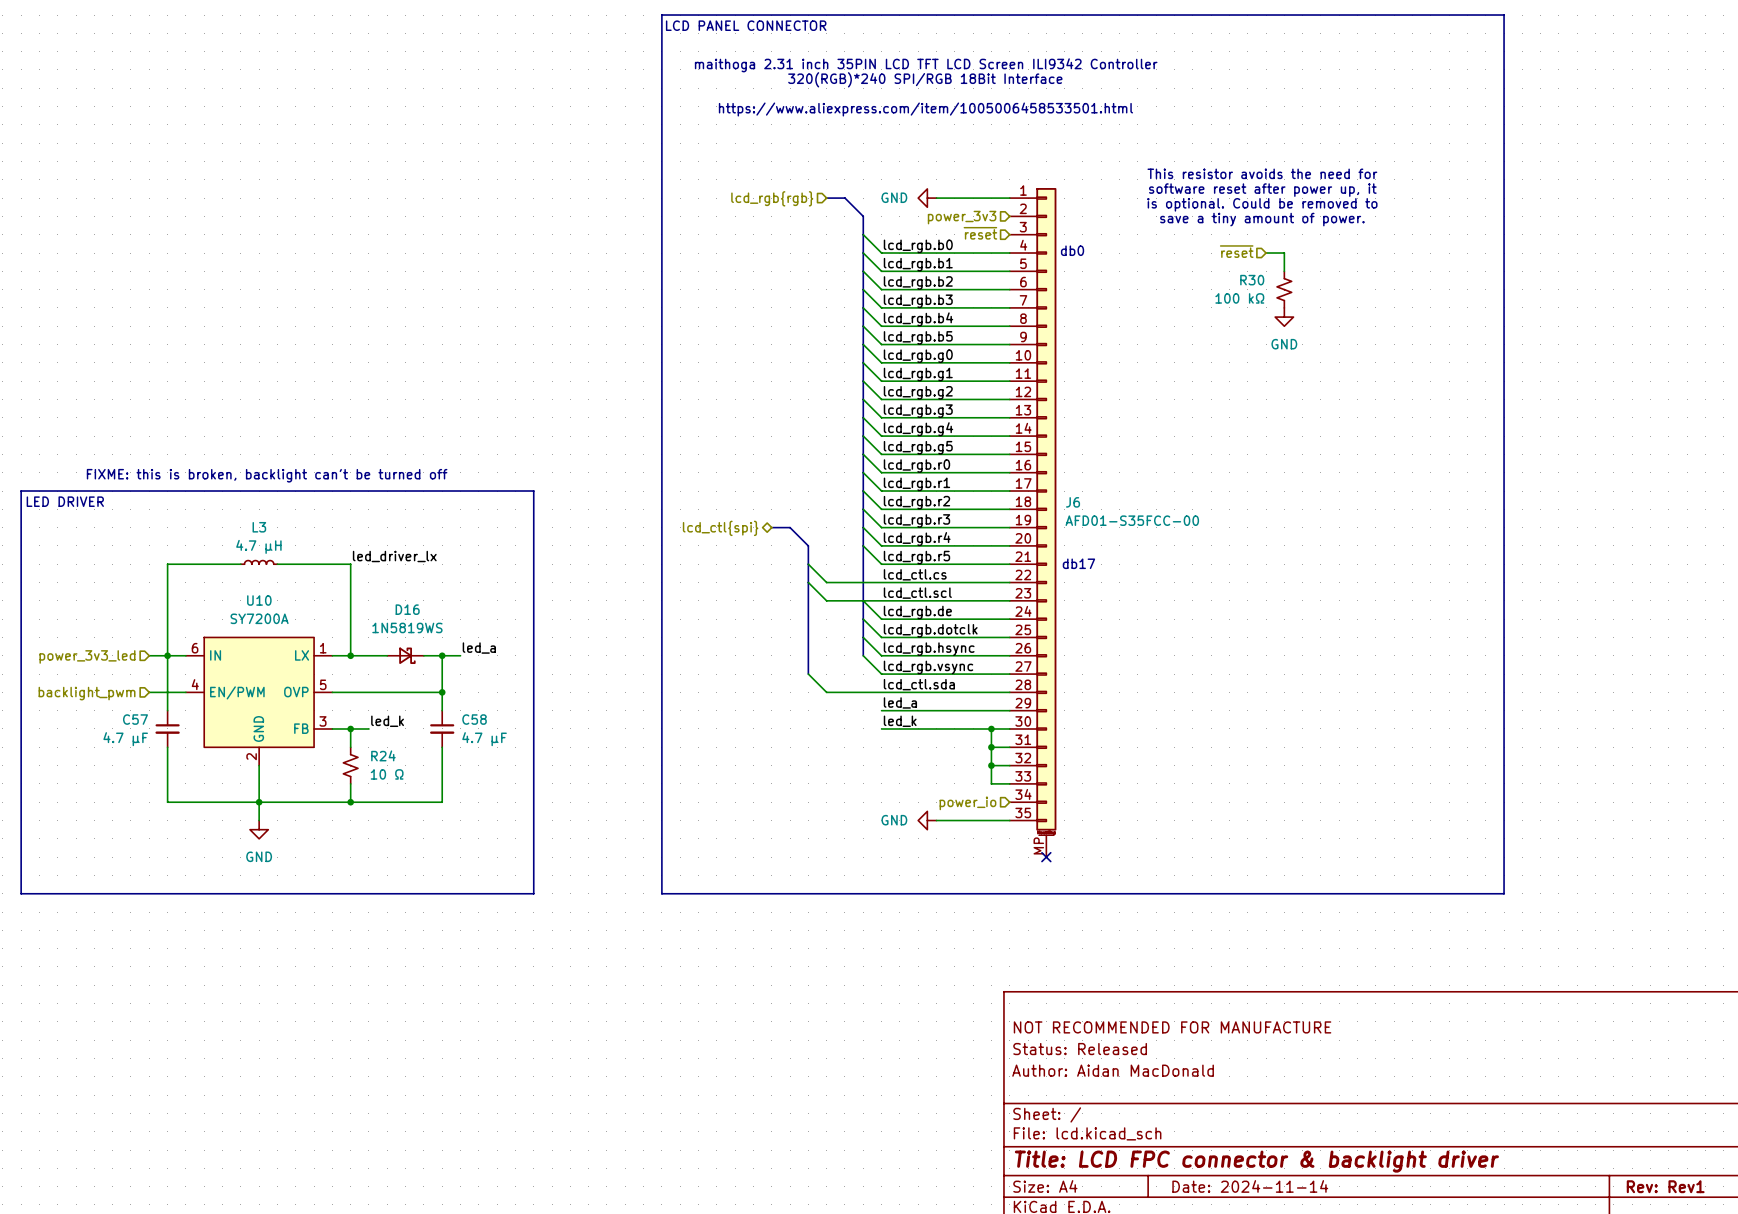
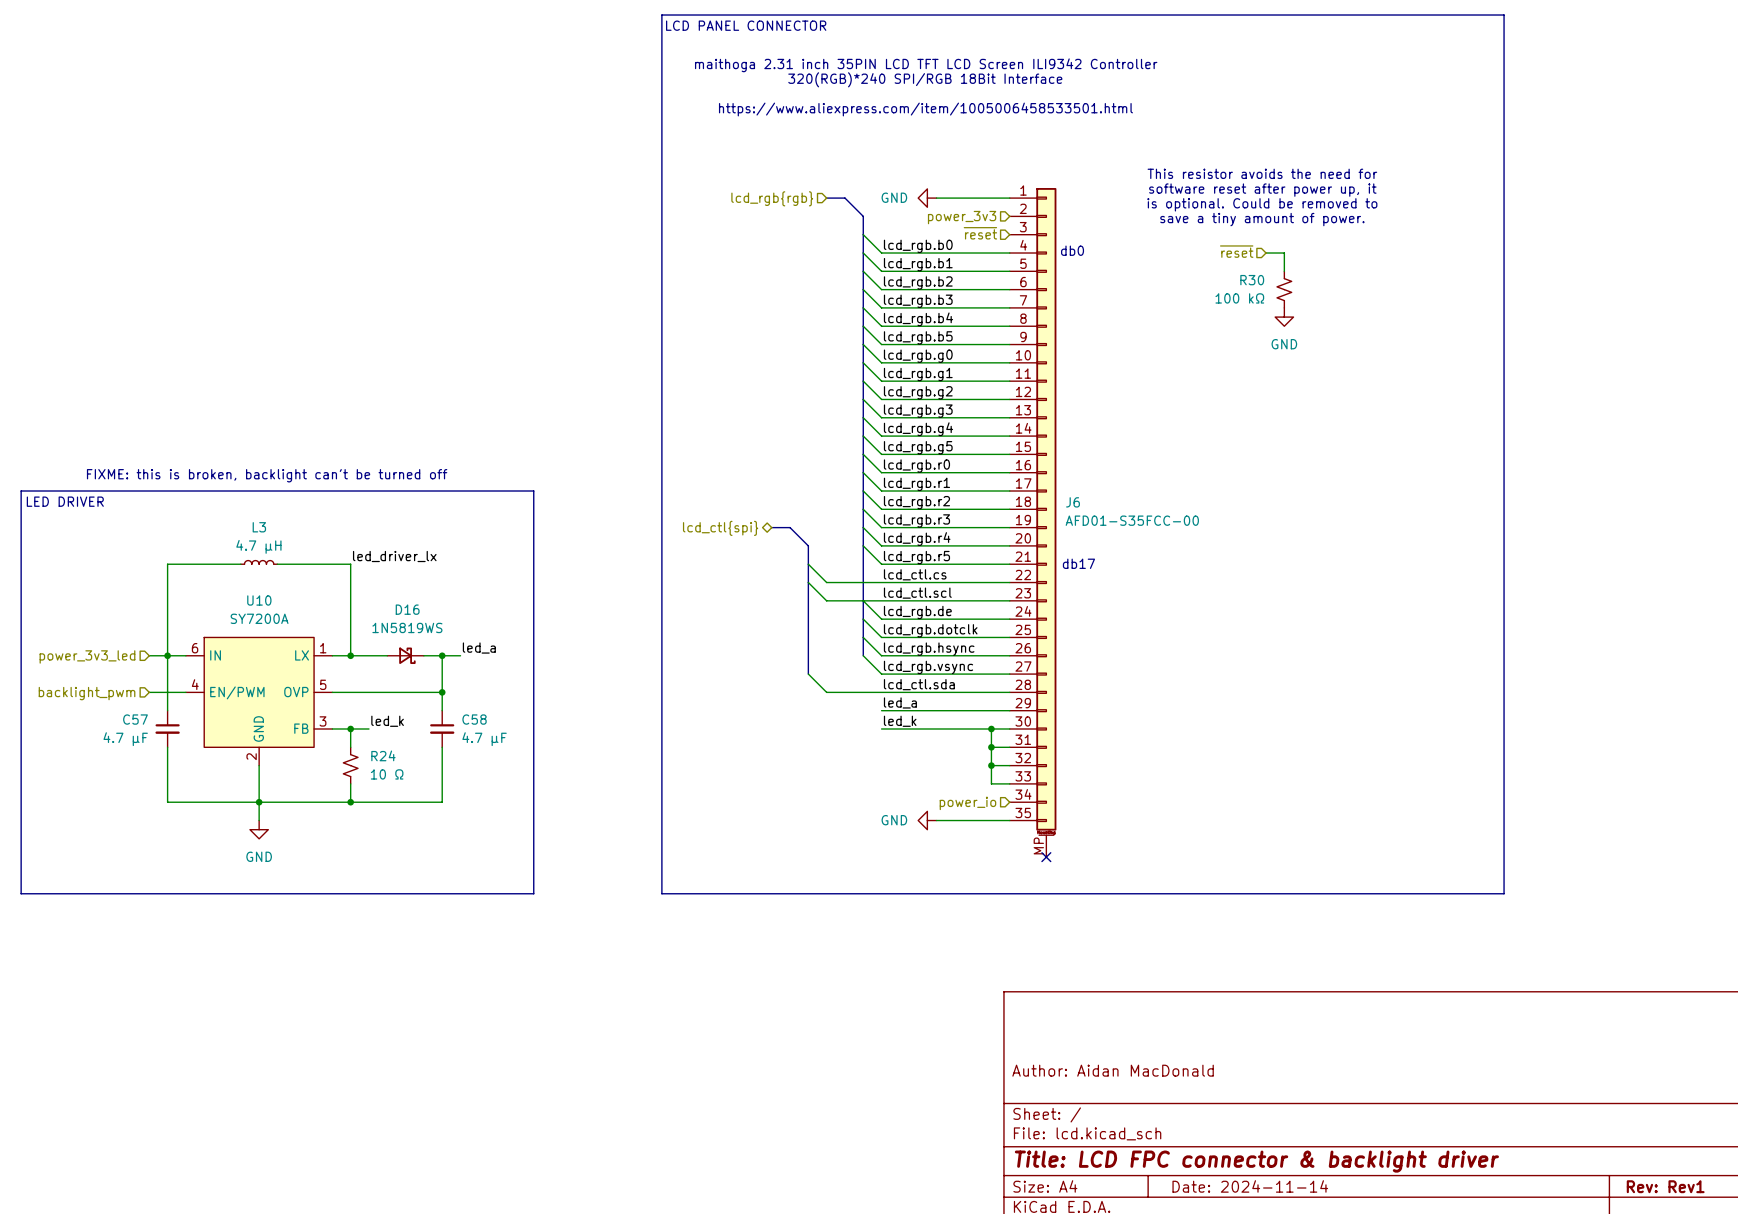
title block: NOT RECOMMENDED FOR MANUFACTURE (1172, 1027) -> none
title block: Status: Released (1080, 1049) -> none

